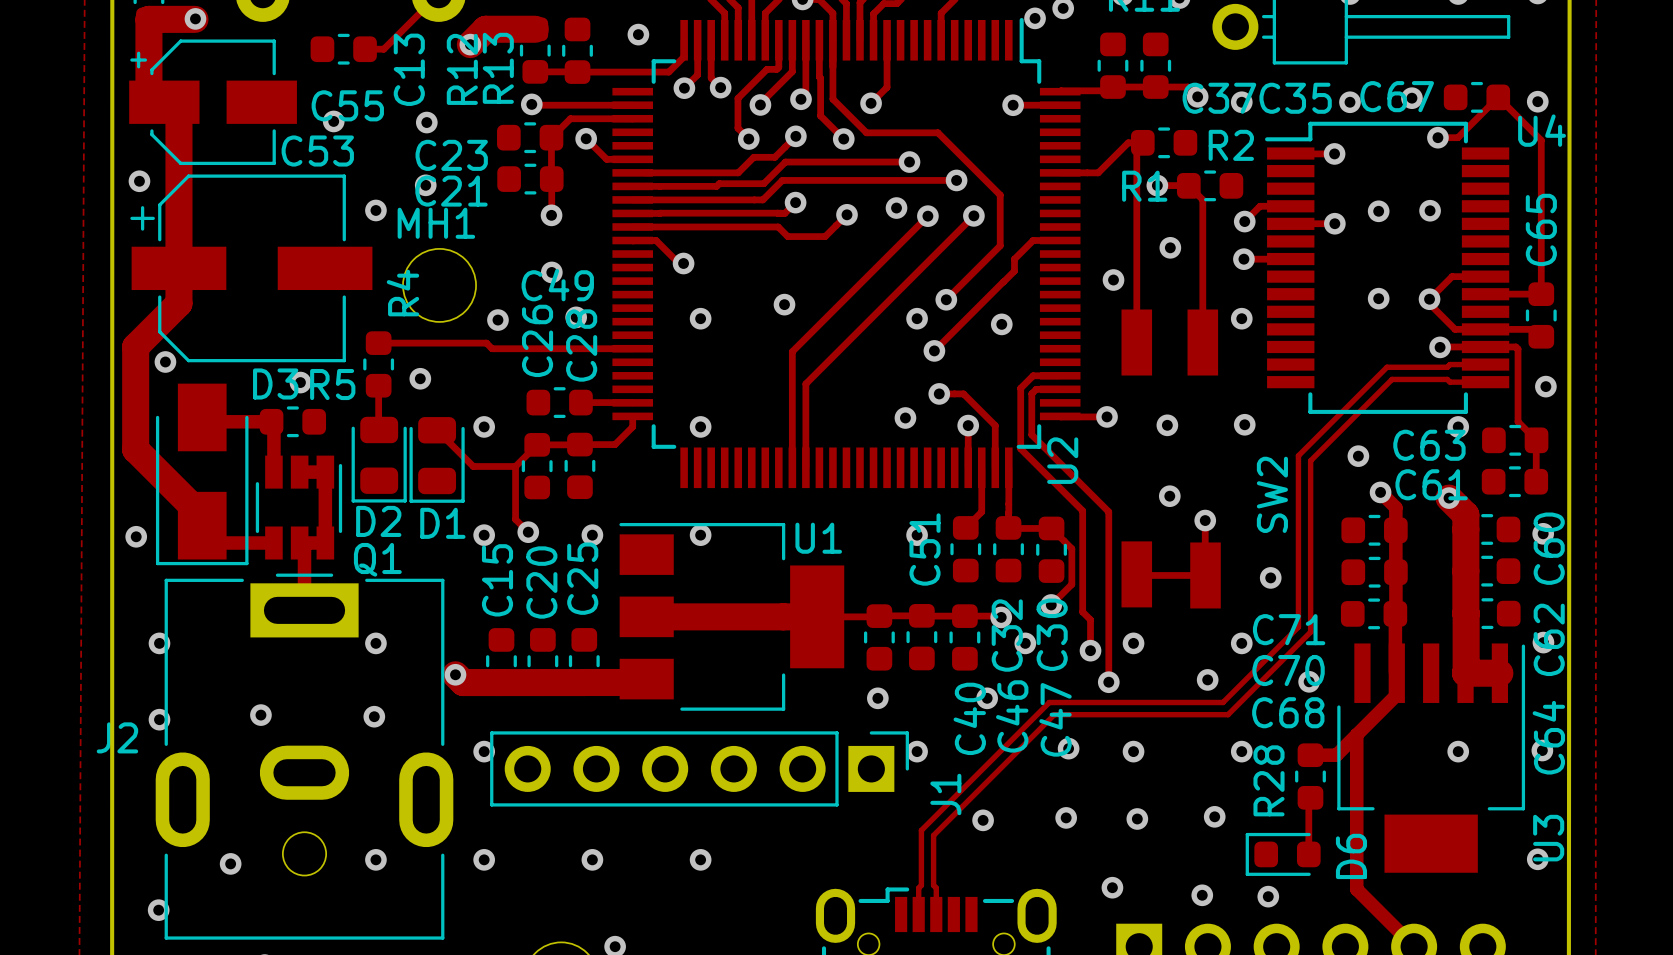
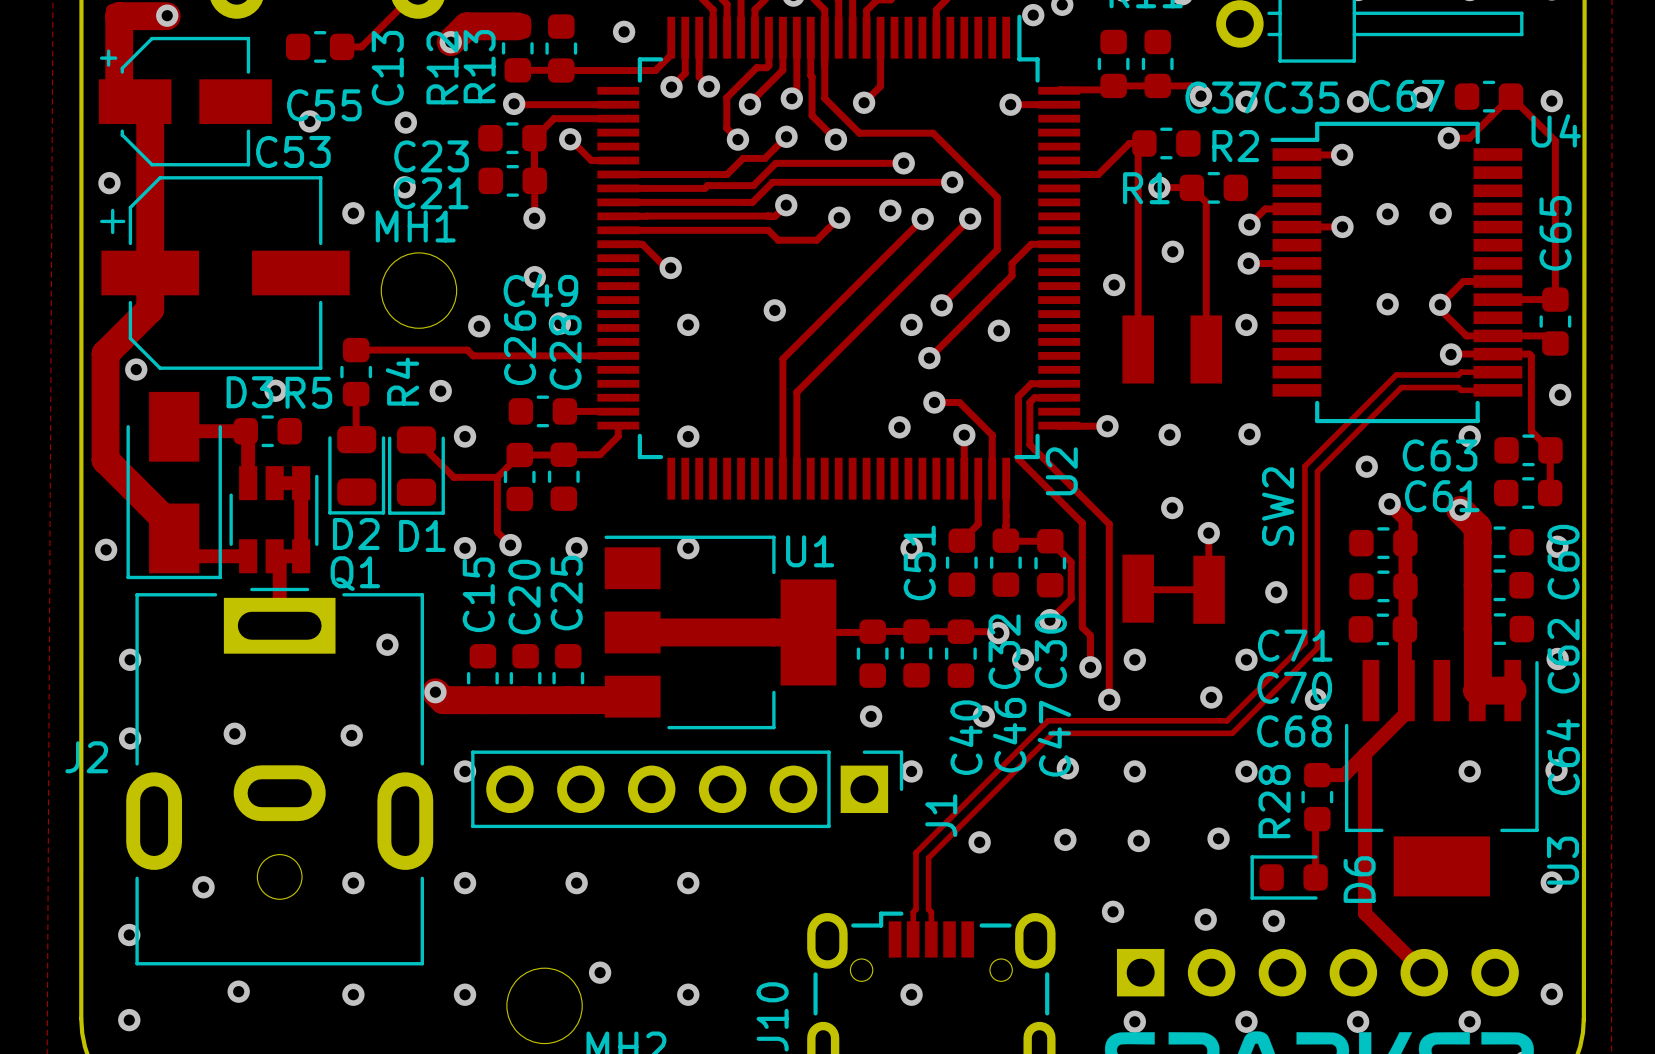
R4 name position: R4 (402, 293) -> R4 (402, 381)
via position: (420, 378) -> (440, 391)
via position: (375, 643) -> (387, 644)

